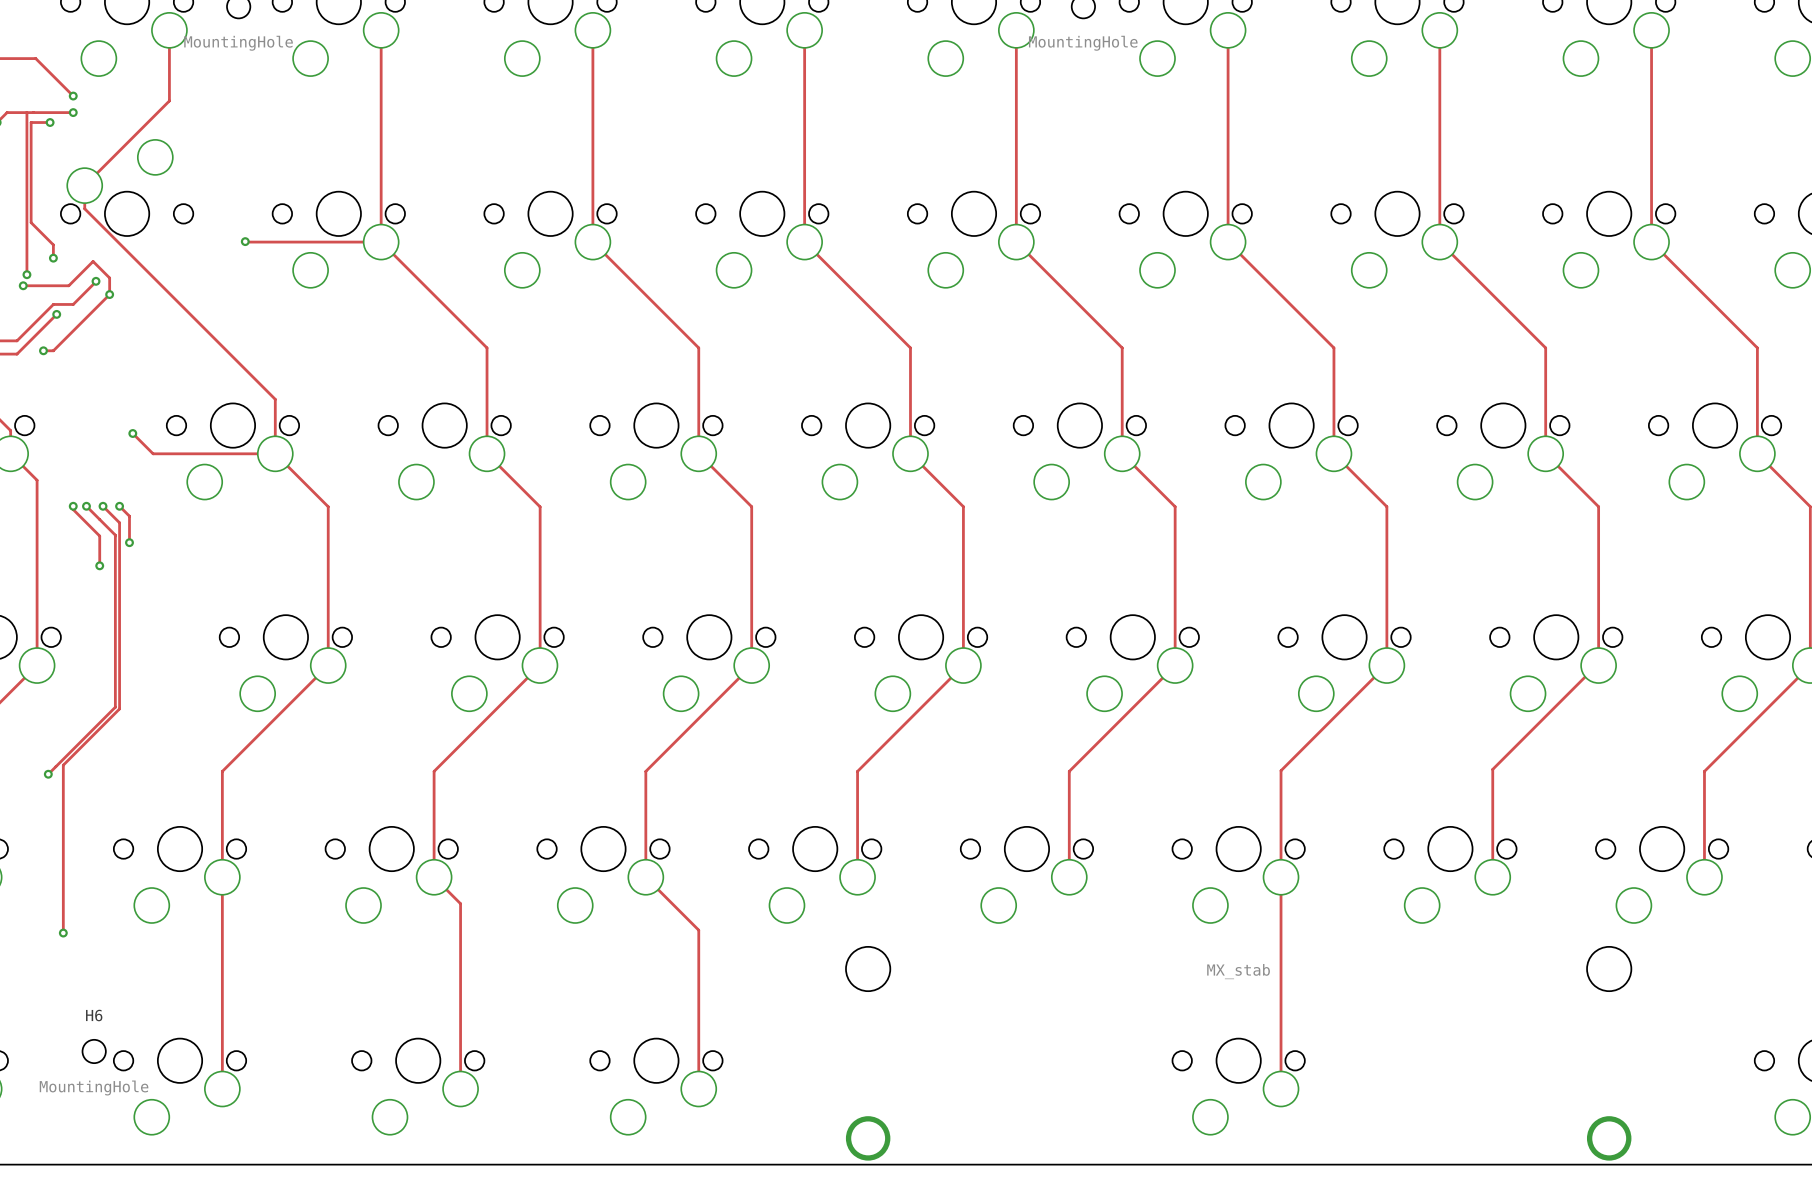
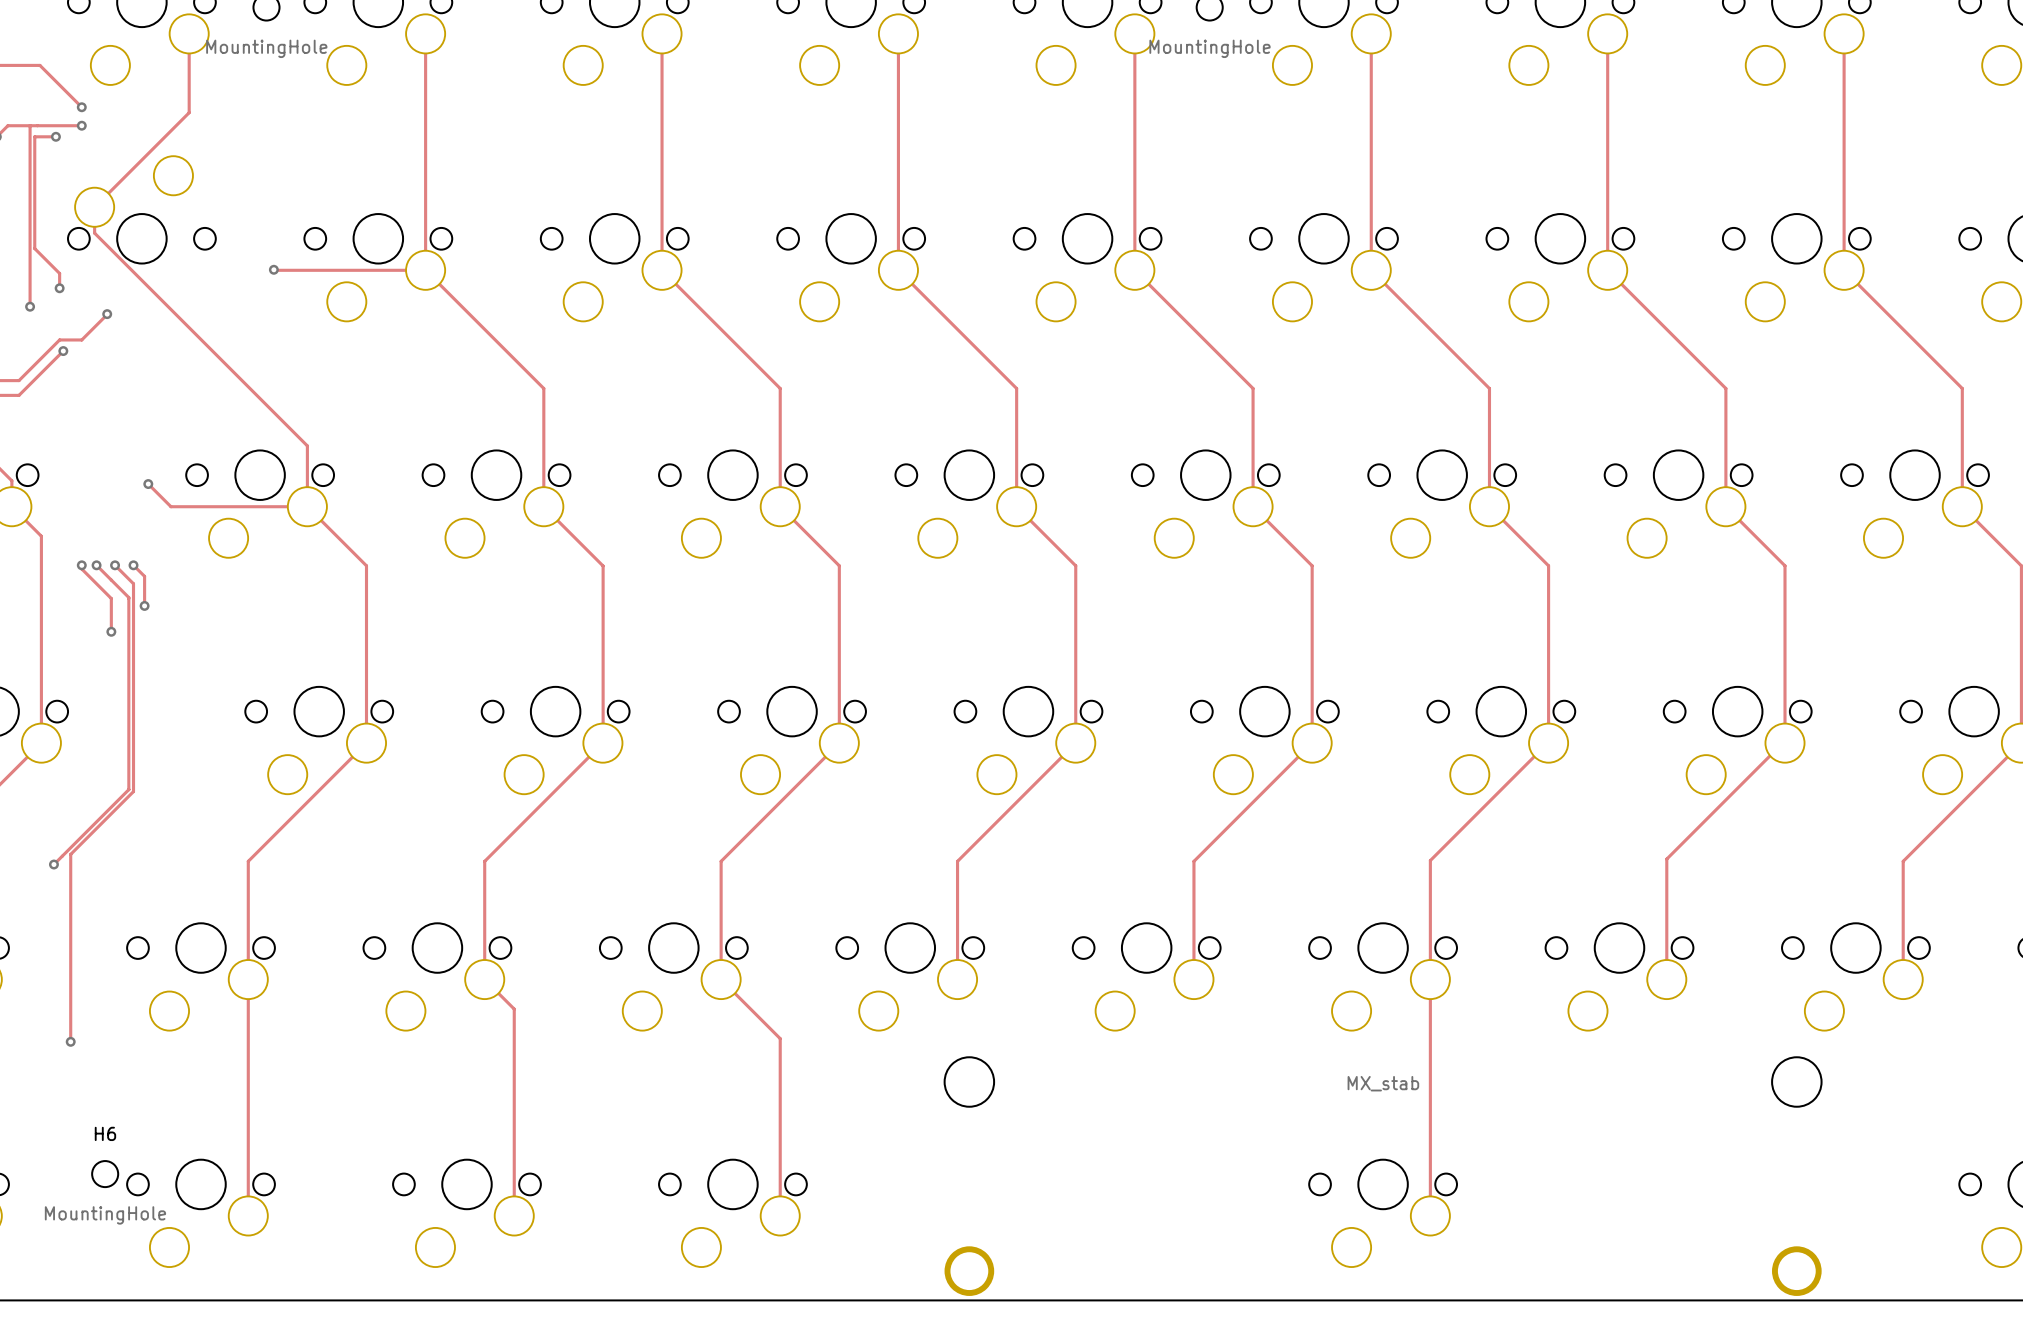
track: (23, 285) (68, 285) (93, 261) (109, 278) (109, 294) (53, 350) (43, 350) -> none
via: (23, 285) -> none
via: (109, 294) -> none
via: (43, 350) -> none

